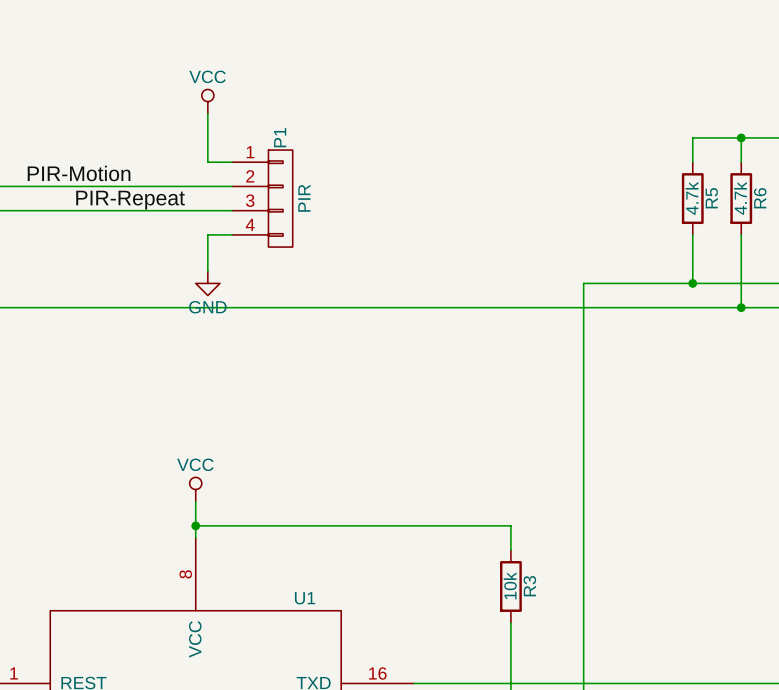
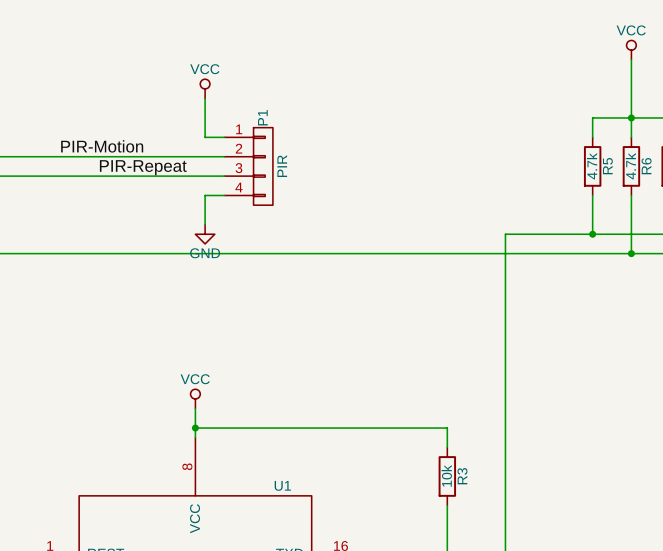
power symbol: none -> VCC (631, 50)
wire: none -> (631, 59) (631, 117)

